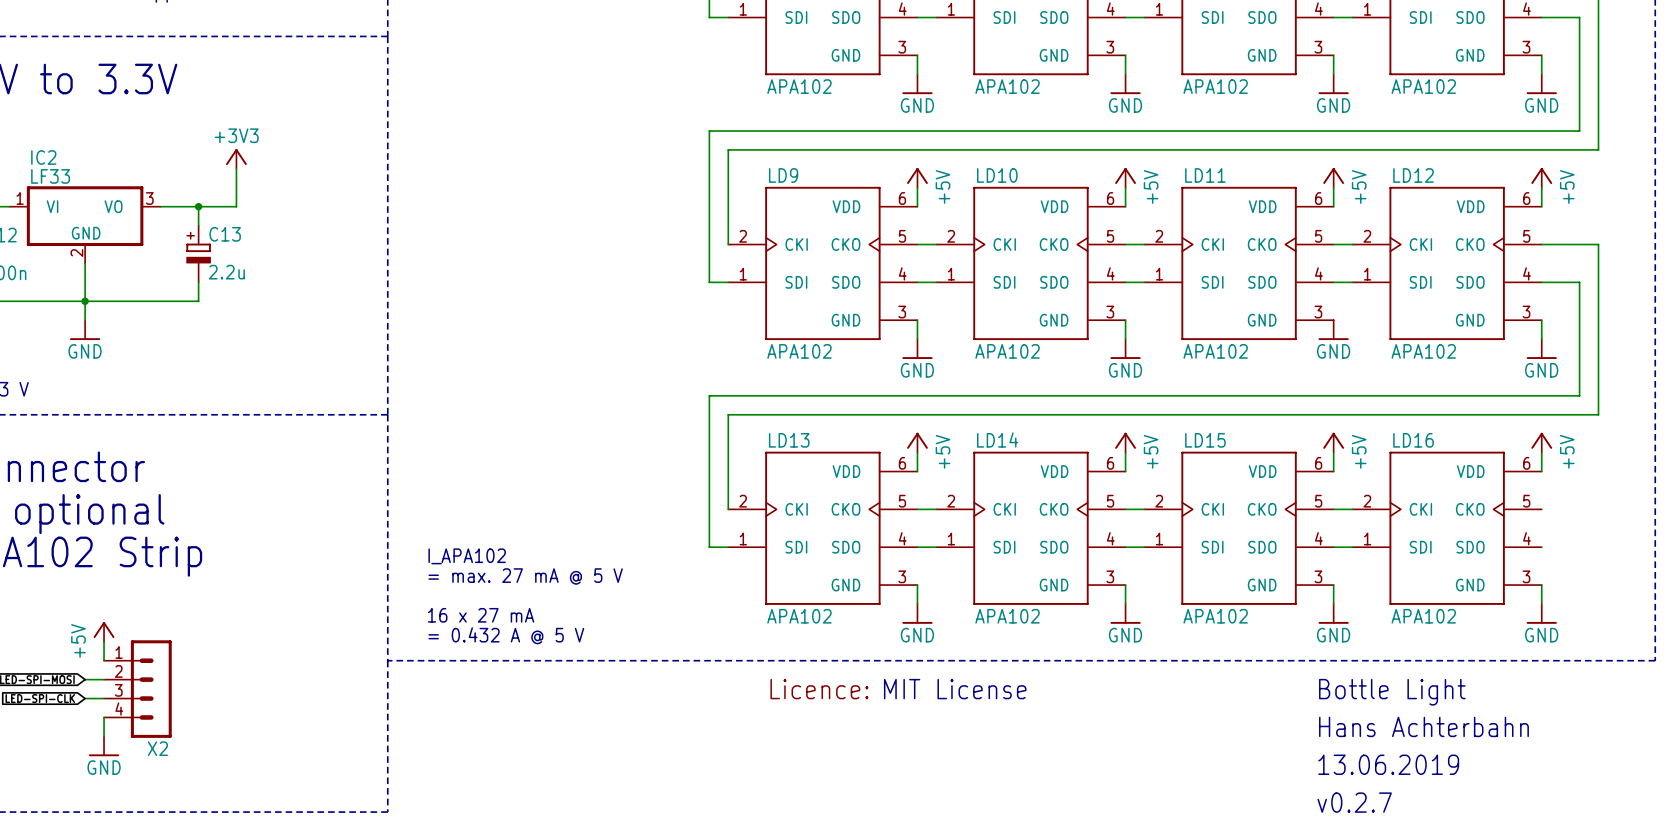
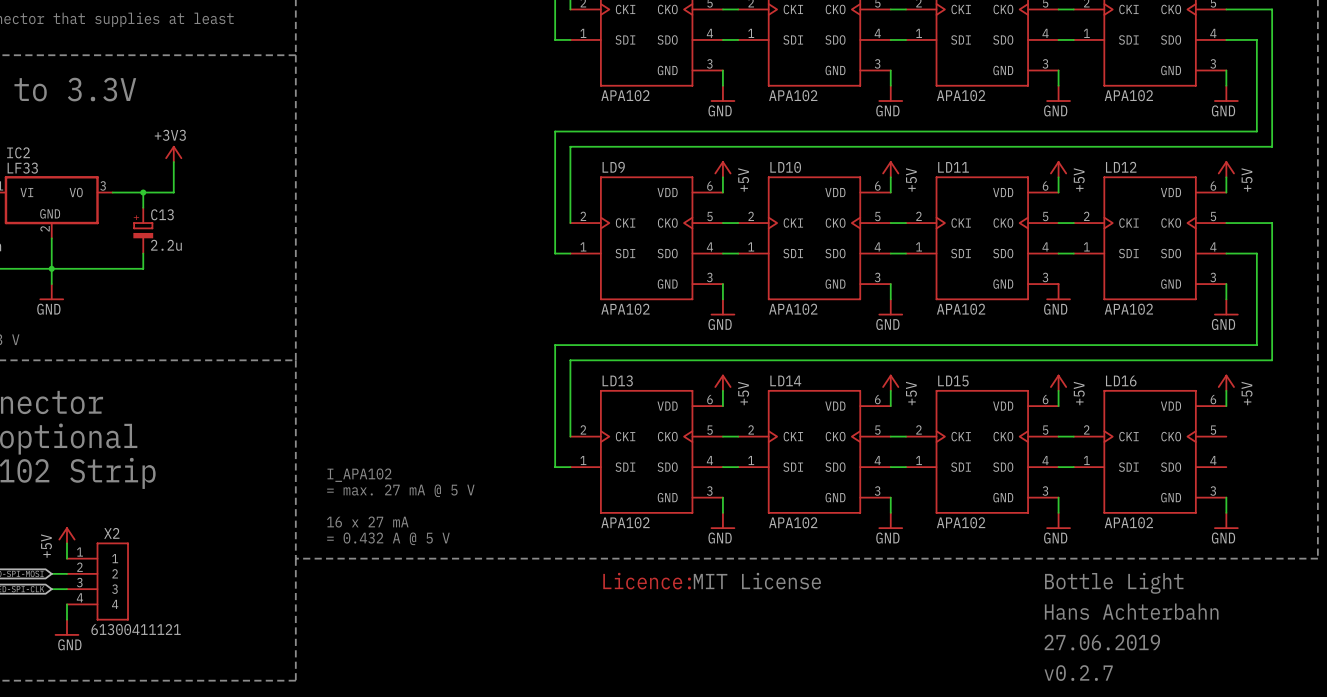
X2 symbol: [104, 640, 172, 738] -> [66, 542, 129, 621]
X2 name position: X2 (157, 748) -> X2 (111, 533)
X2 value: none -> 61300411121 (136, 629)
text: 13.06.2019 (1388, 764) -> 27.06.2019 (1102, 642)

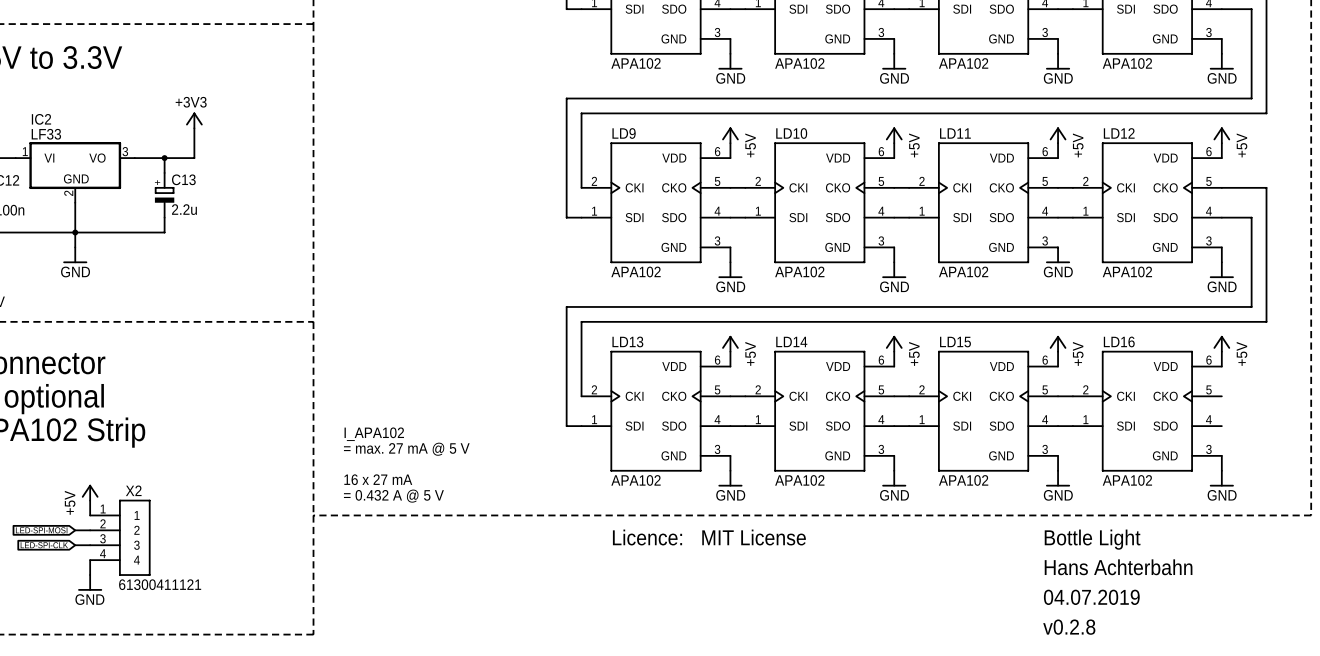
text: 27.06.2019 (1102, 642) -> 04.07.2019 (1091, 597)
text: v0.2.7 (1078, 673) -> v0.2.8 (1069, 627)

